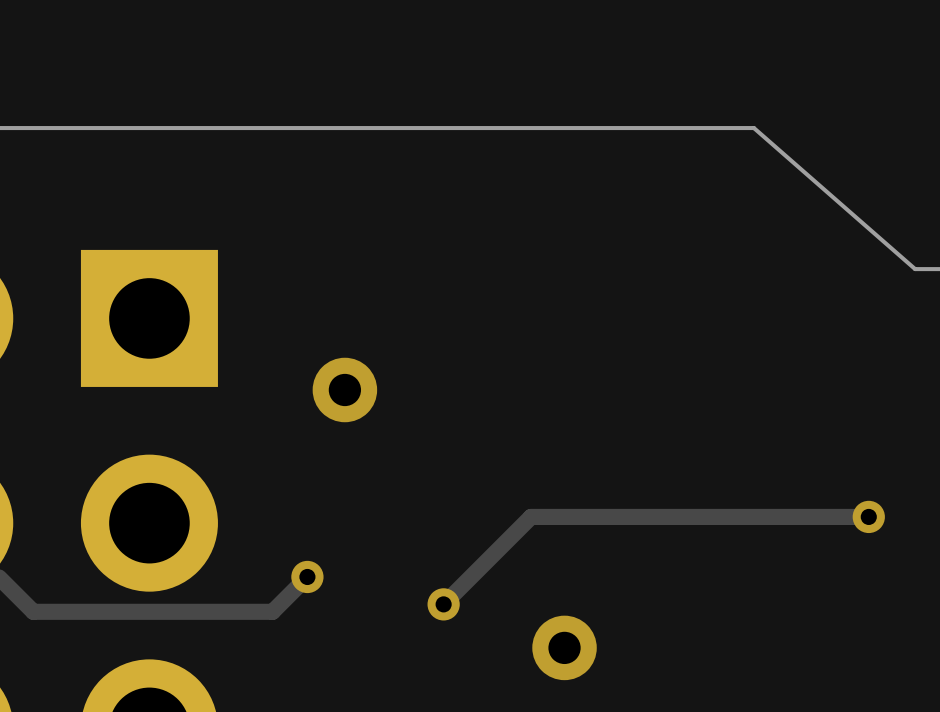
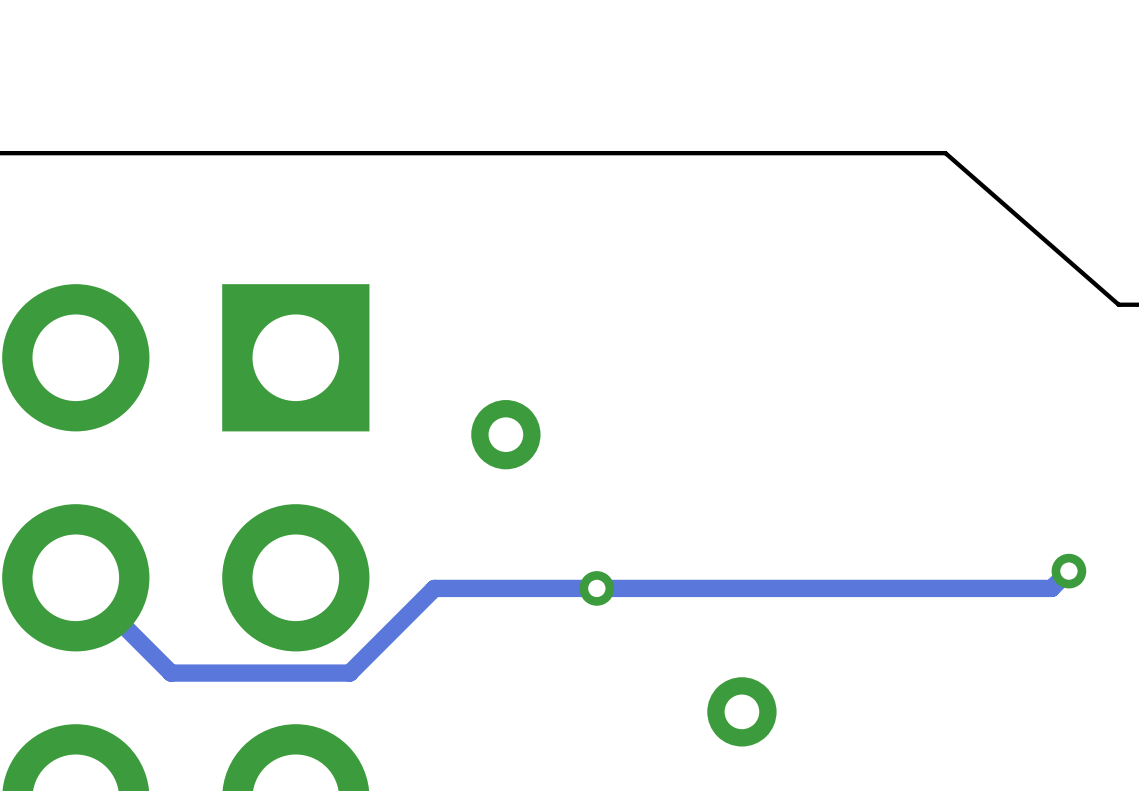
track: (868, 516) (531, 516) (443, 604) -> (1068, 571) (1051, 588) (434, 588) (349, 673)
via: none -> (596, 588)
track: (307, 576) (272, 611) (199, 611) -> none
via: (307, 576) -> none
via: (443, 604) -> none

